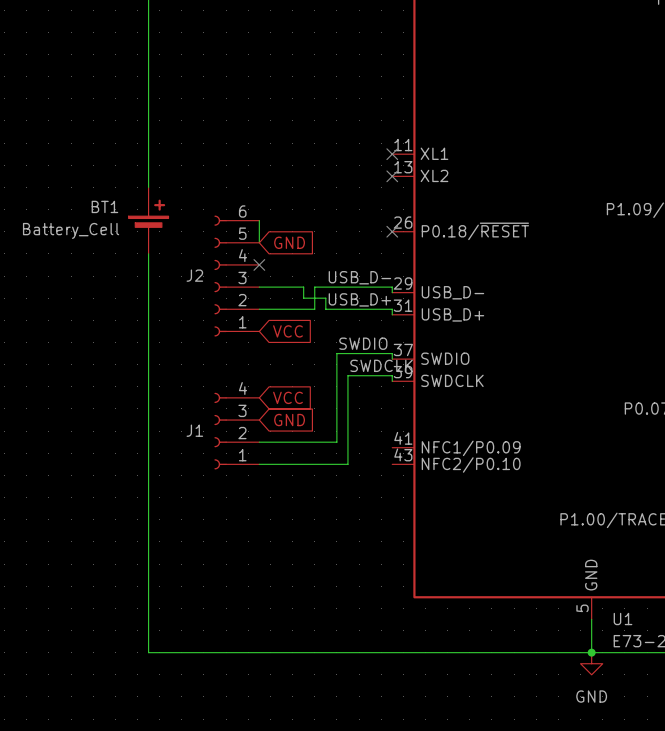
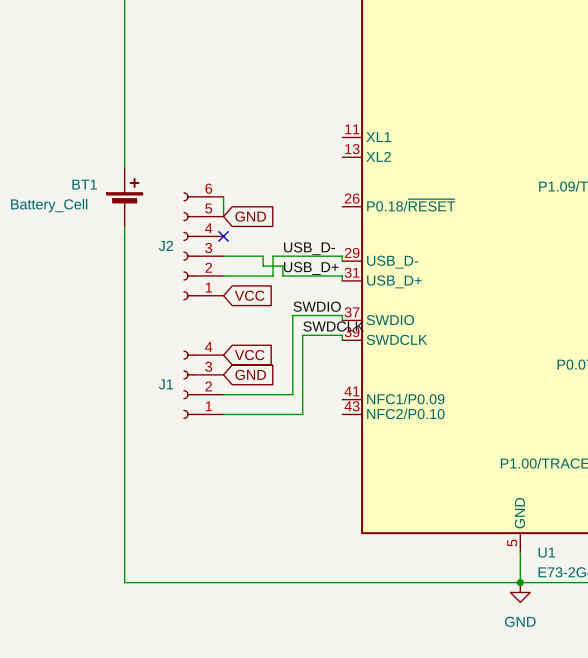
no-connect mark: (392, 154) -> none
no-connect mark: (392, 176) -> none
no-connect mark: (392, 231) -> none

